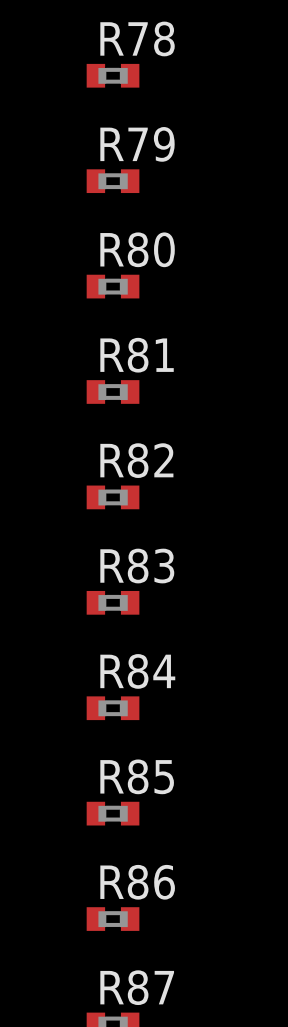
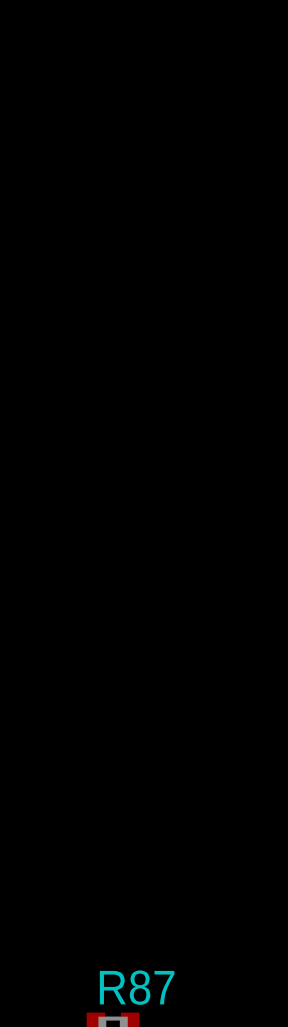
R78: (113, 75) -> none
R79: (113, 181) -> none
R80: (113, 286) -> none
R81: (113, 391) -> none
R82: (113, 497) -> none
R83: (113, 602) -> none
R84: (113, 708) -> none
R85: (113, 813) -> none
R86: (113, 919) -> none

